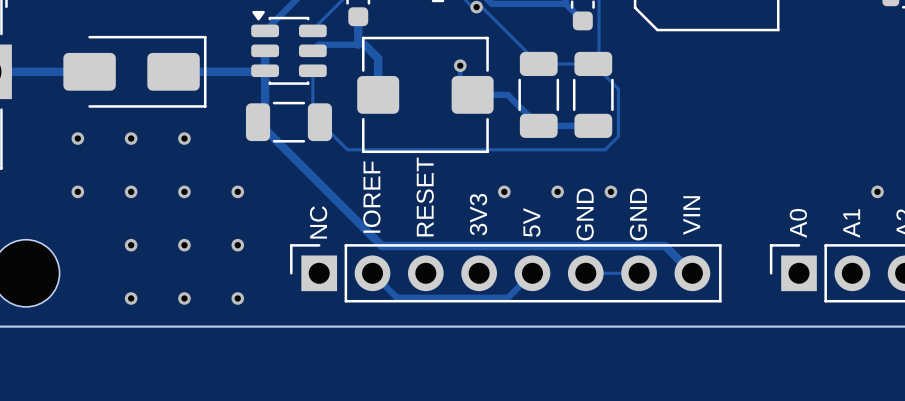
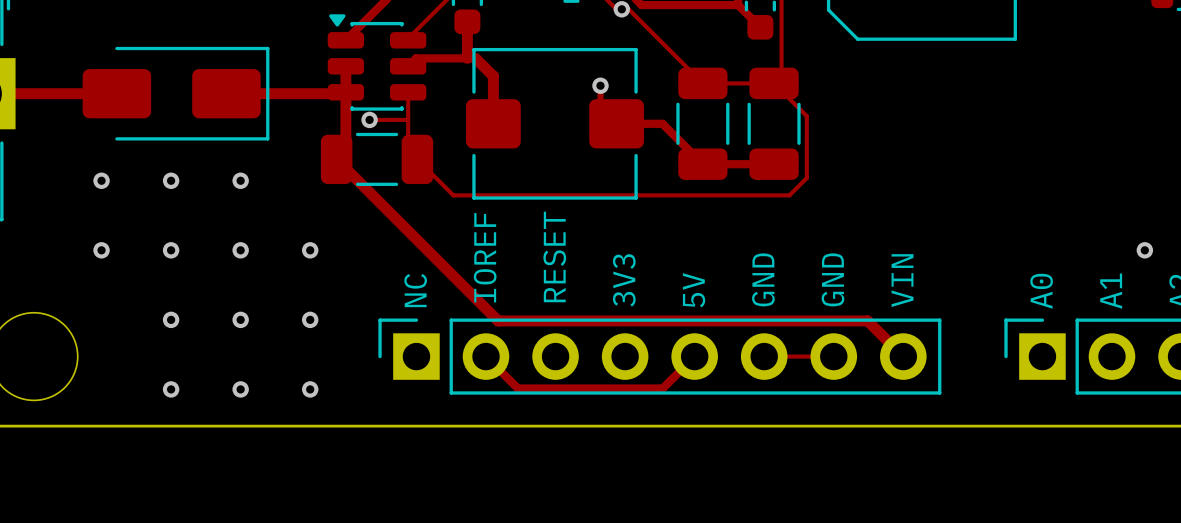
track: none -> (369, 119) (408, 119)
via: none -> (369, 119)
via: (504, 191) -> none
via: (557, 191) -> none
via: (610, 191) -> none

